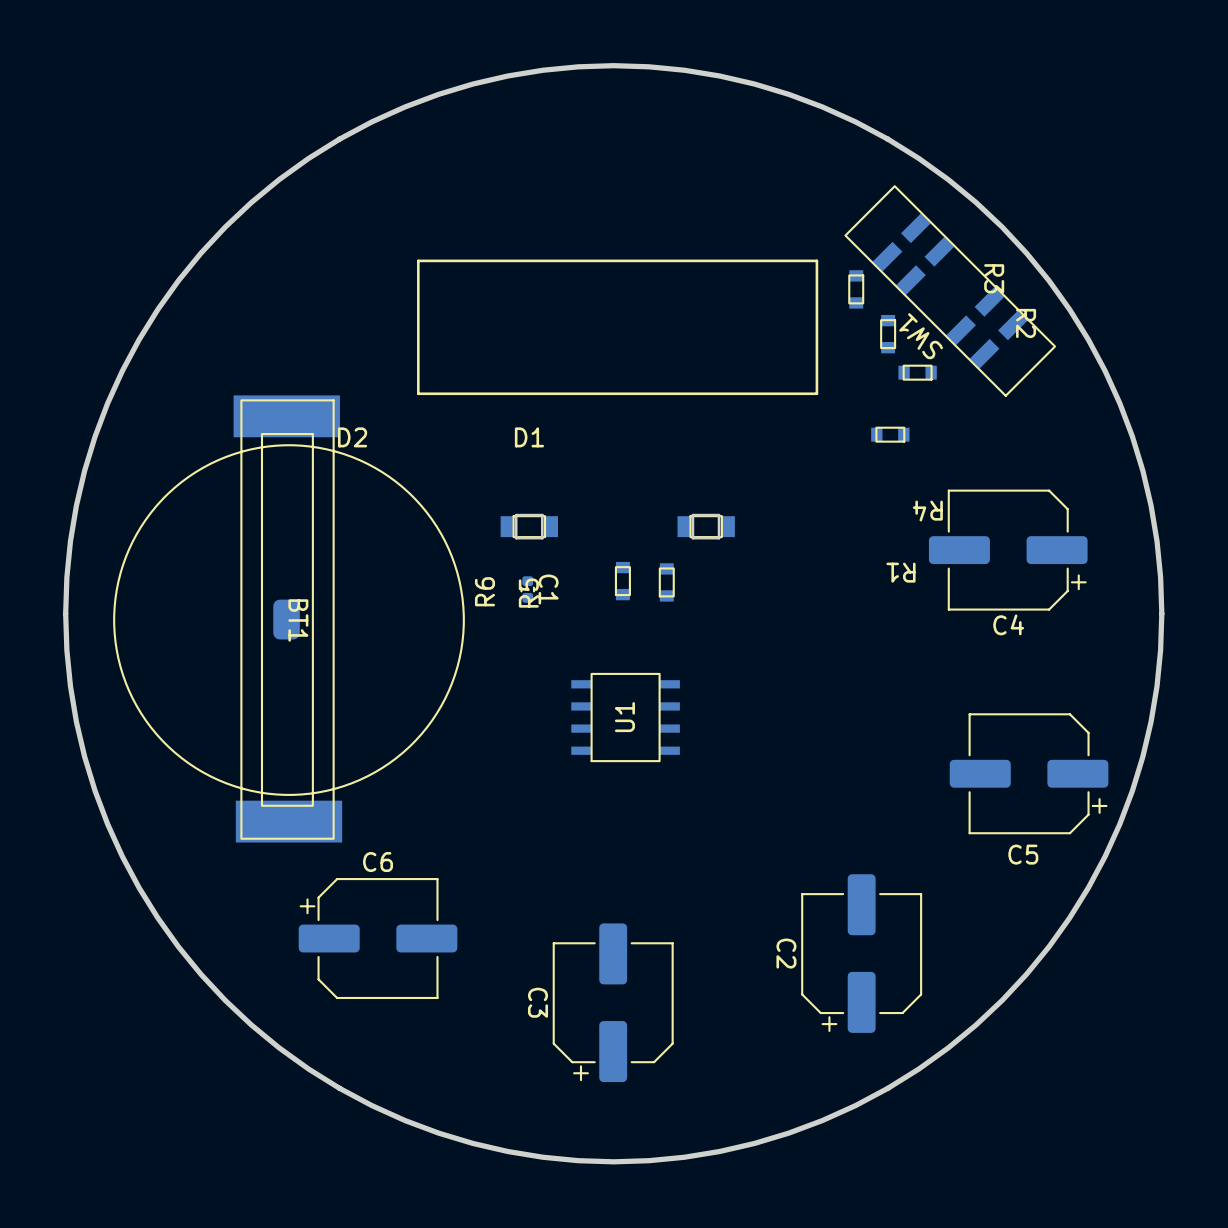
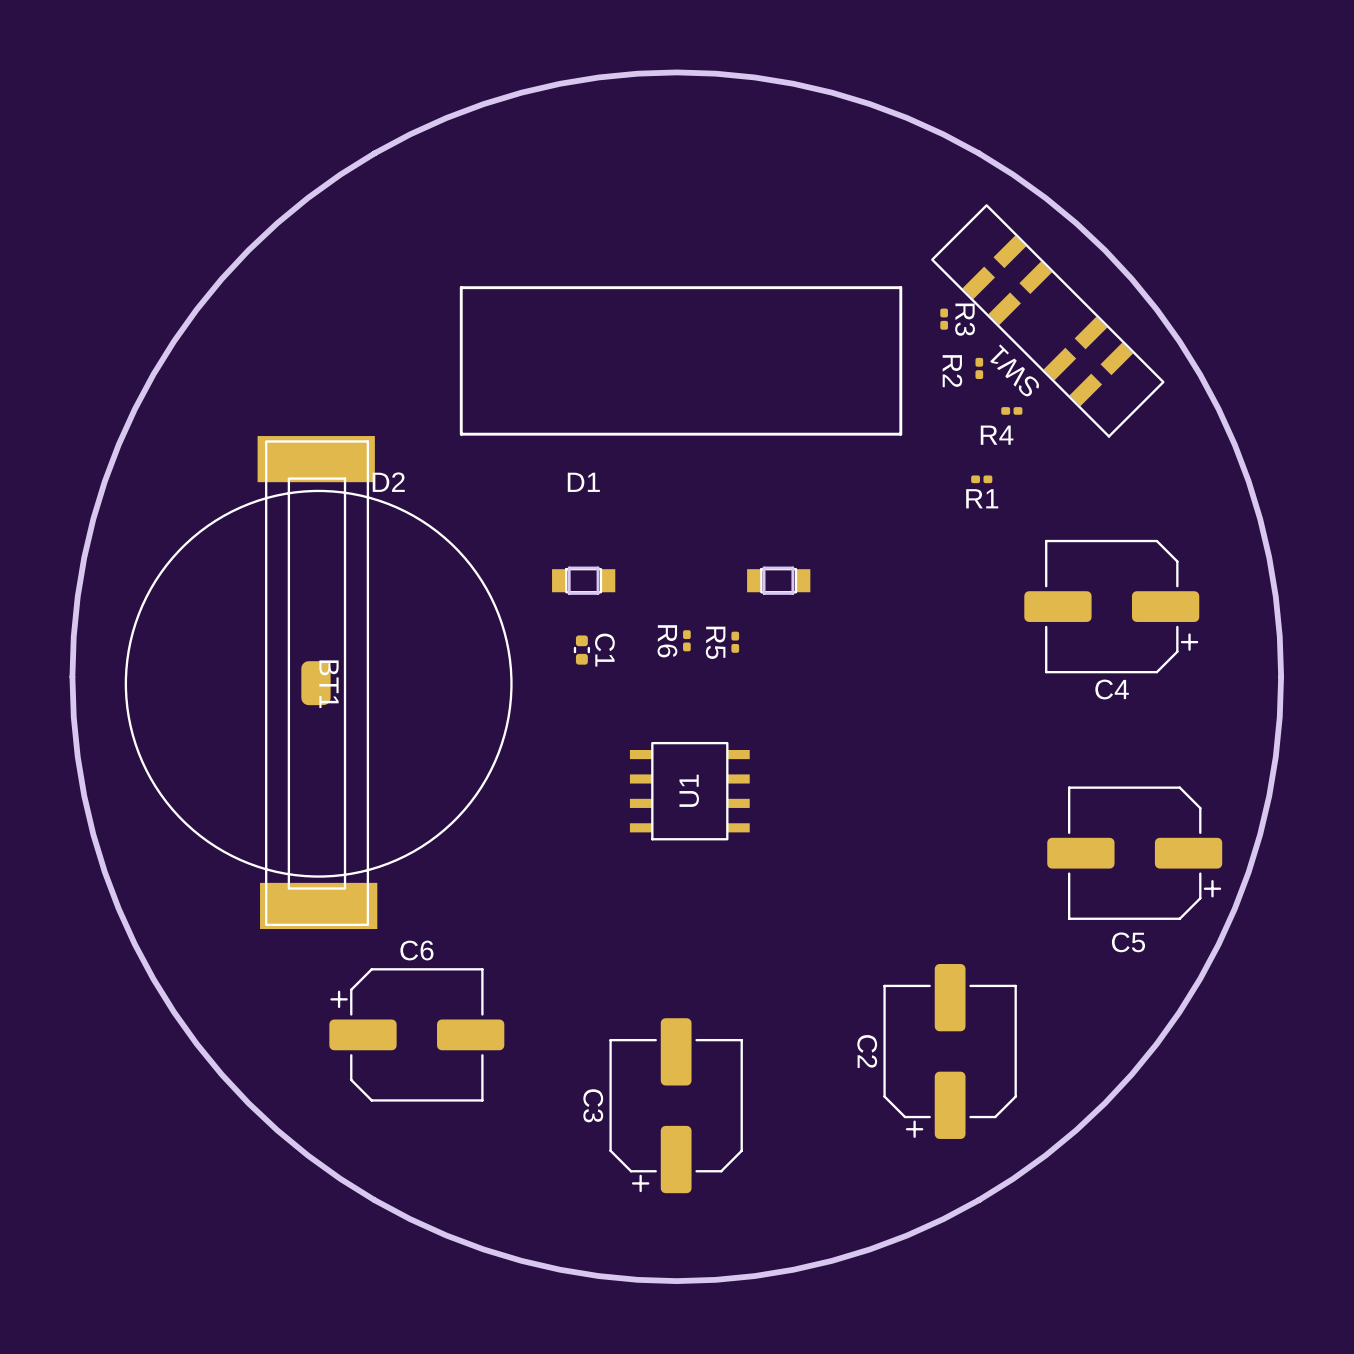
R3 footprint: [848, 270, 865, 309] -> [940, 308, 948, 330]
R3 name position: R3 (994, 278) -> R3 (965, 319)
R2 footprint: [880, 314, 897, 354] -> [975, 357, 984, 380]
R2 name position: R2 (1026, 323) -> R2 (952, 371)
R4 footprint: [898, 364, 937, 381] -> [1001, 407, 1023, 415]
R1 footprint: [871, 426, 910, 443] -> [971, 475, 993, 484]
R4 name position: R4 (927, 511) -> R4 (997, 435)
R6 footprint: [614, 561, 631, 601] -> [683, 630, 691, 652]
R5 footprint: [658, 563, 675, 602] -> [731, 631, 740, 653]
R1 name position: R1 (900, 572) -> R1 (982, 498)
R6 name position: R6 (484, 591) -> R6 (667, 641)
R5 name position: R5 (528, 593) -> R5 (715, 642)

